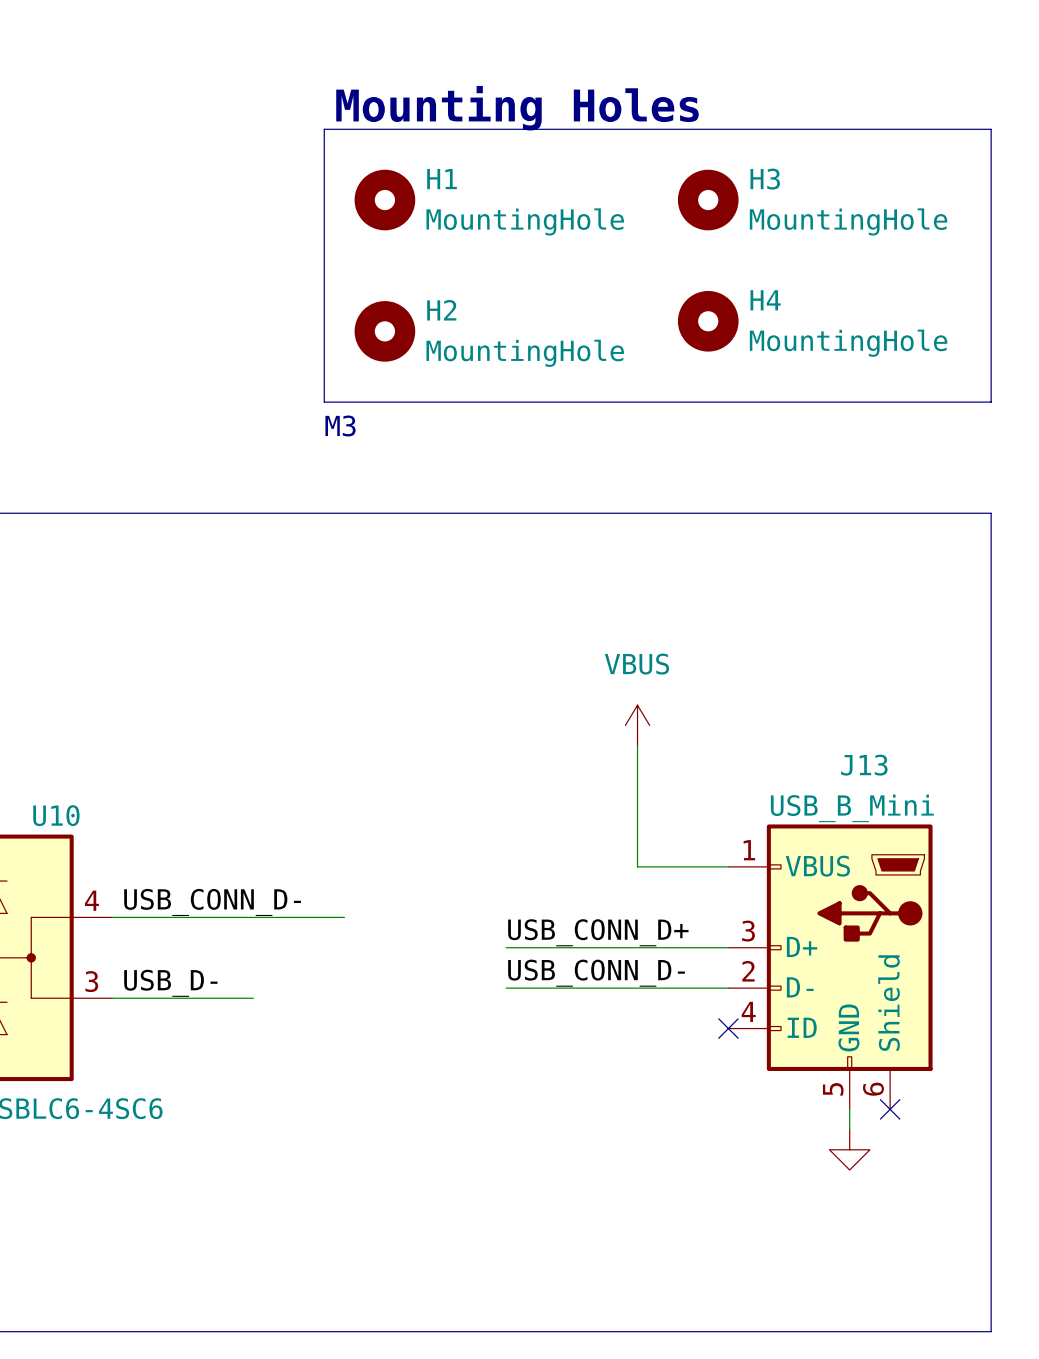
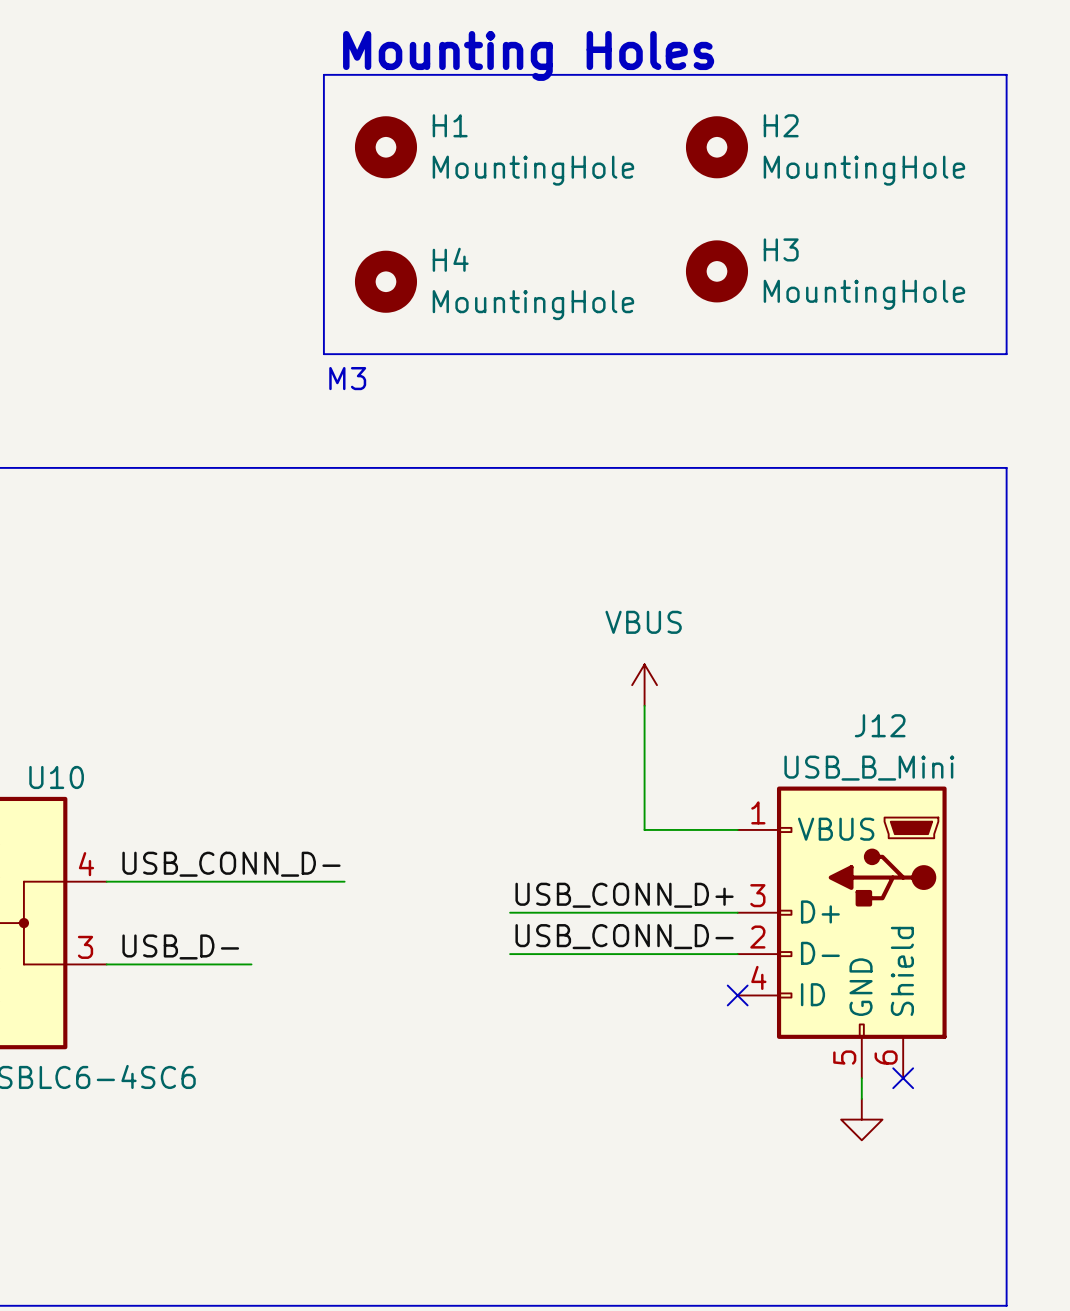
H3 name: H3 (765, 179) -> H2 (781, 125)
H4 name: H4 (765, 300) -> H3 (781, 249)
H2 name: H2 (441, 310) -> H4 (450, 259)
J13 name: J13 (864, 765) -> J12 (880, 725)

